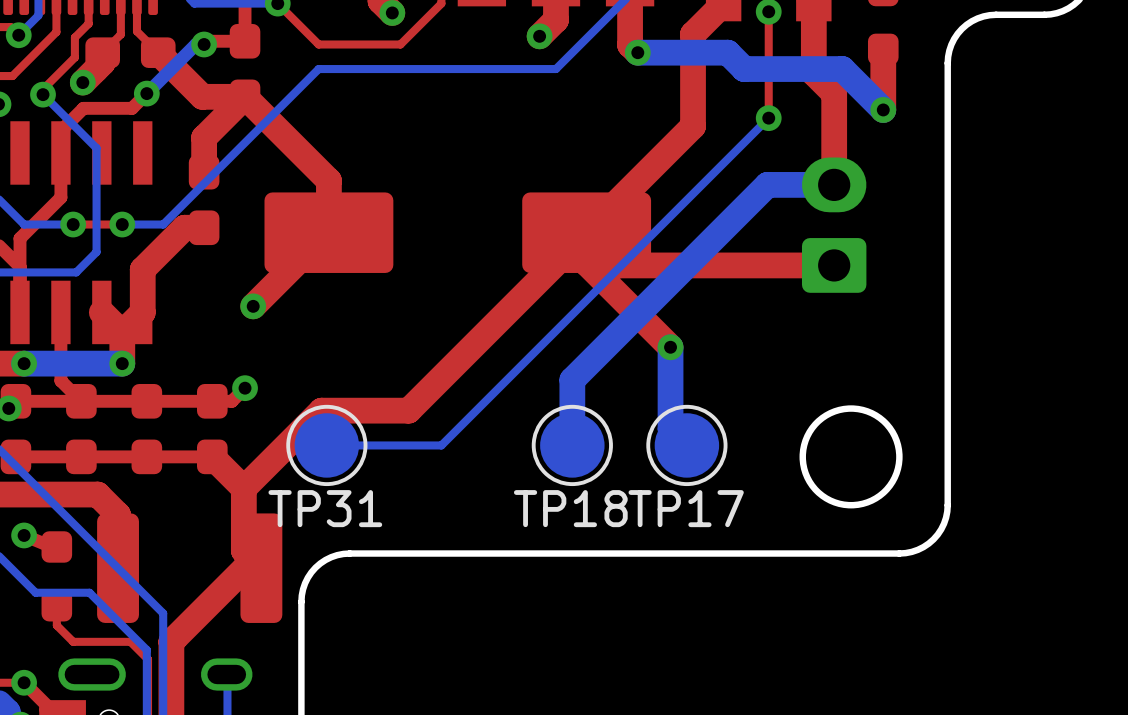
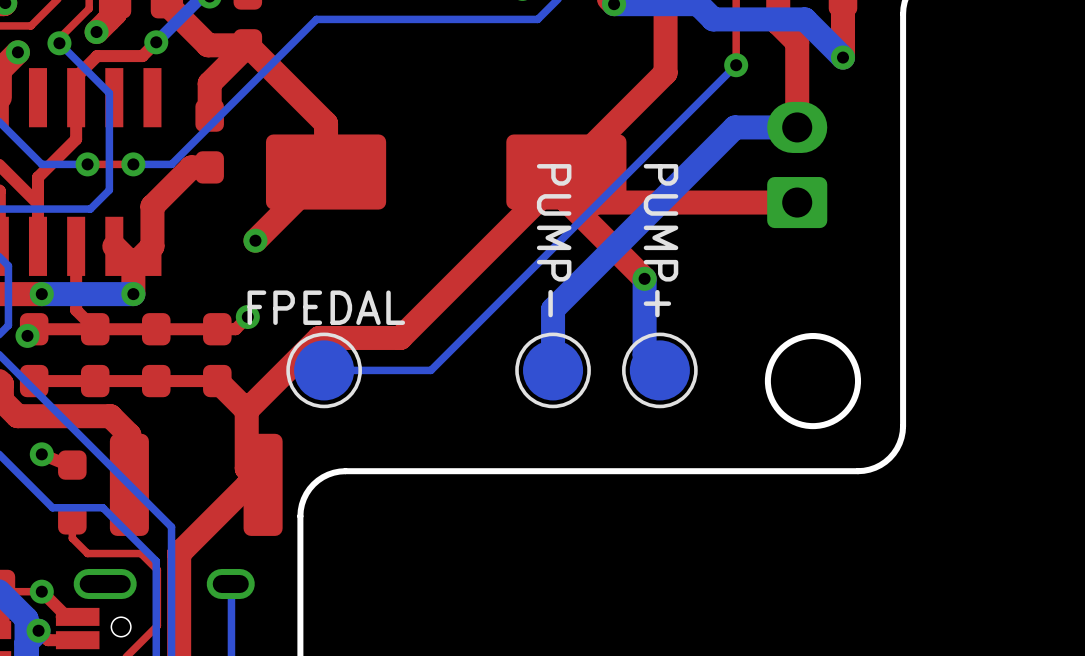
TP18 value: none -> PUMP- (554, 240)
TP17 value: none -> PUMP+ (660, 240)
TP31 value: none -> FPEDAL (326, 307)
TP31 name: TP31 (325, 508) -> none
TP18 name: TP18 (570, 508) -> none
TP17 name: TP17 (686, 508) -> none

